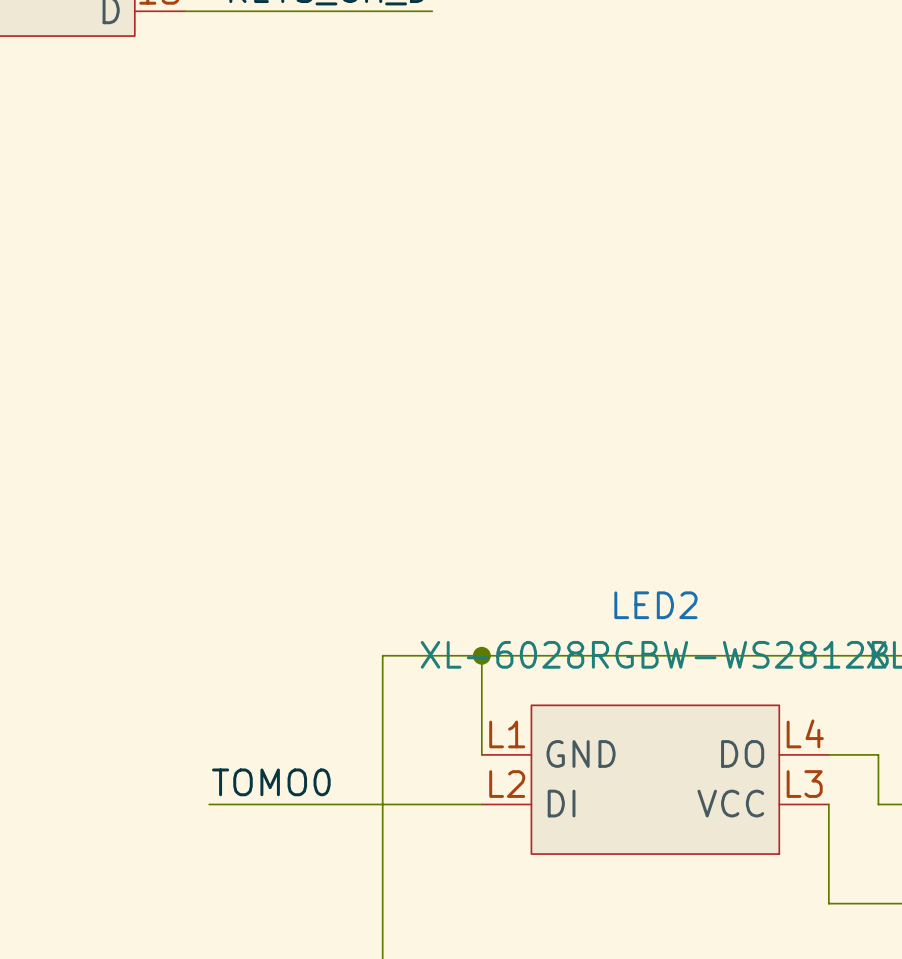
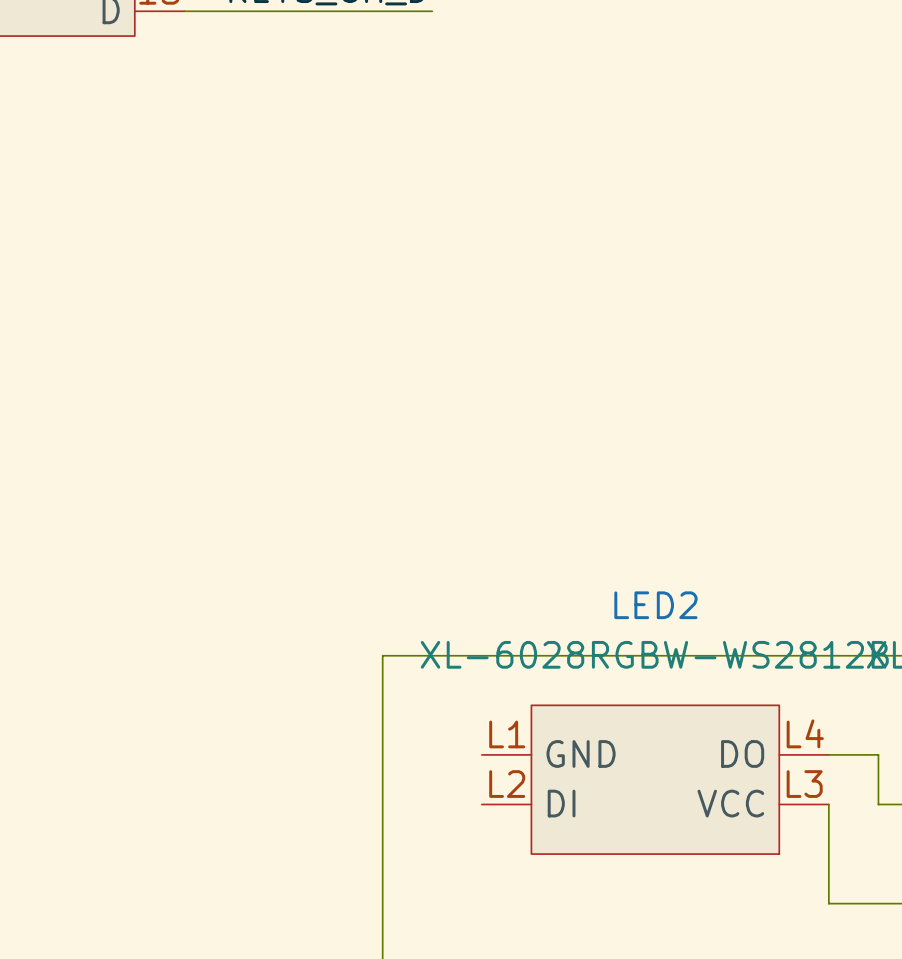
wire: (481, 655) (481, 754) -> none
junction: (481, 655) -> none
label: TOMO0 (271, 782) -> none
wire: (209, 804) (481, 804) -> none

